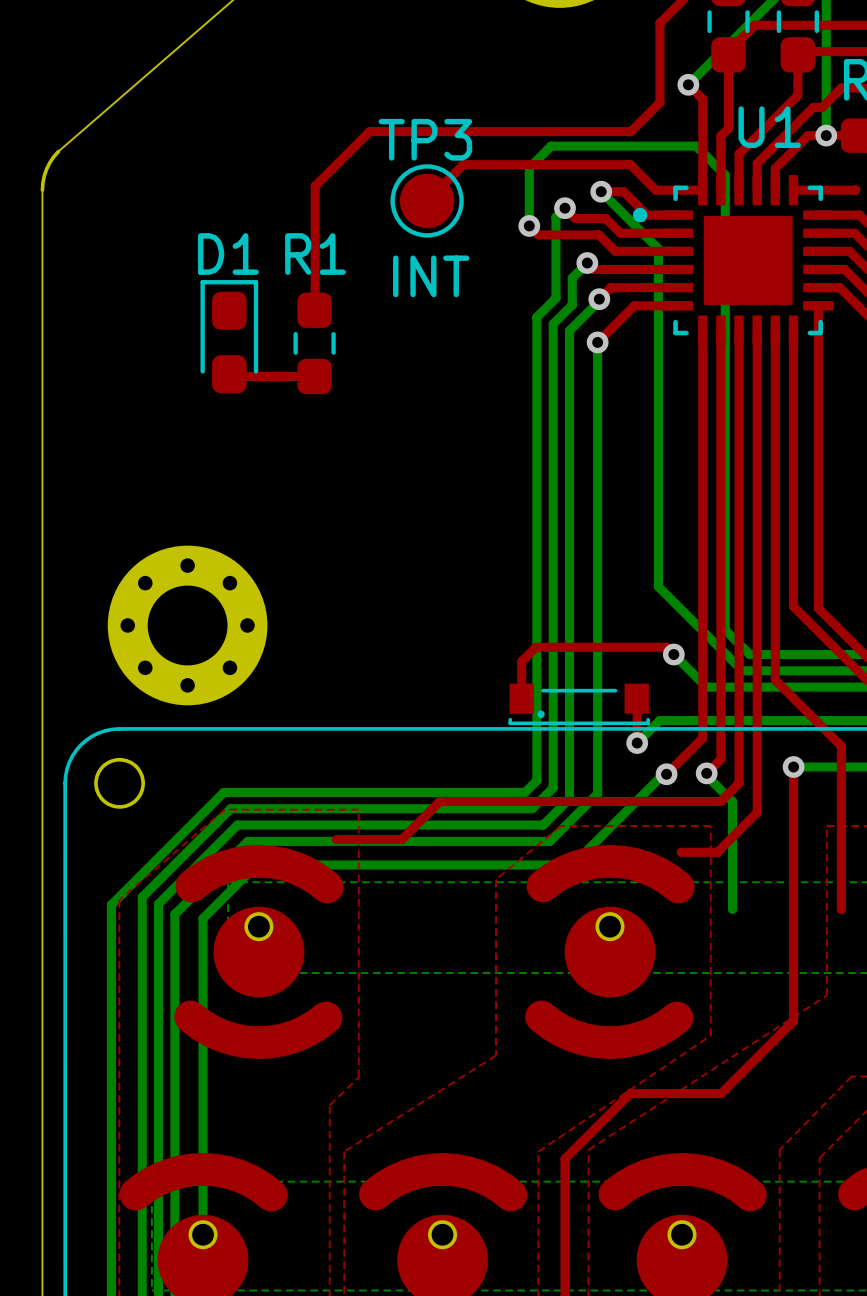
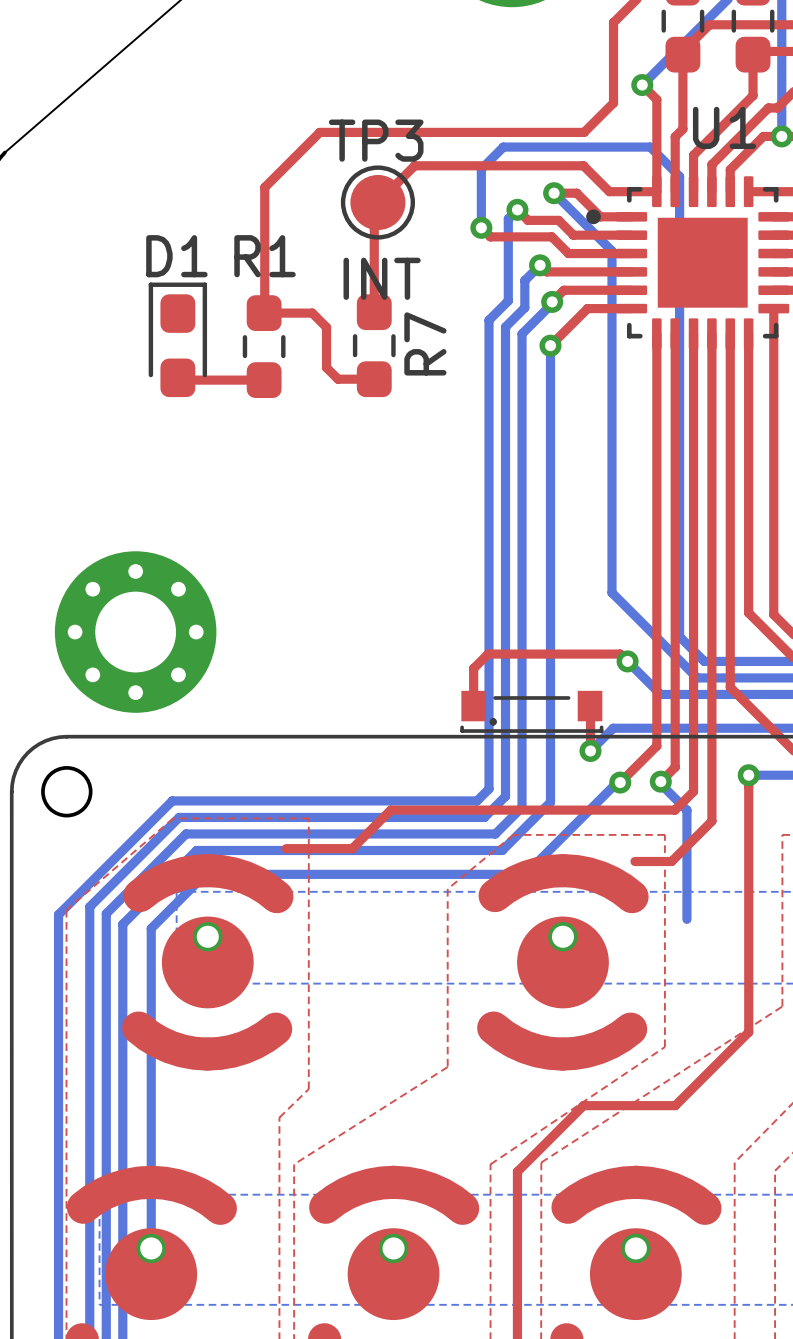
top track: none -> (377, 202) (374, 206) (374, 312)
top track: none -> (264, 313) (312, 313) (326, 327) (326, 367) (338, 379) (374, 379)
R7: none -> (374, 345)

